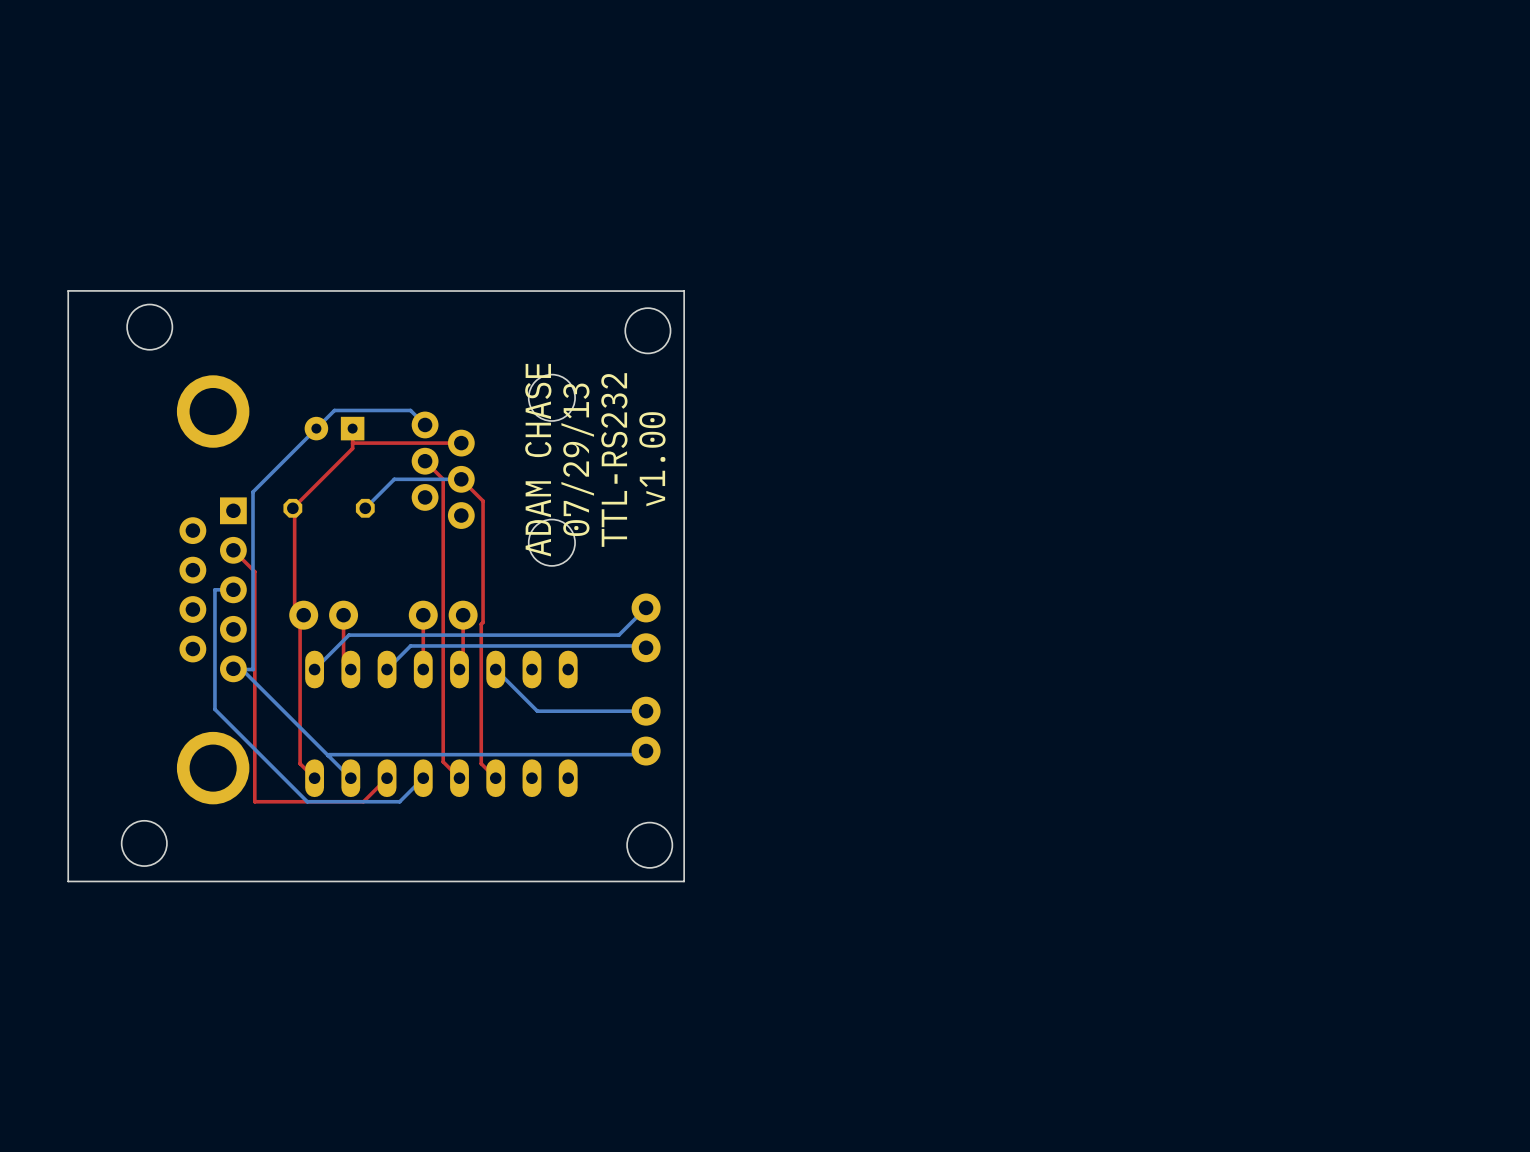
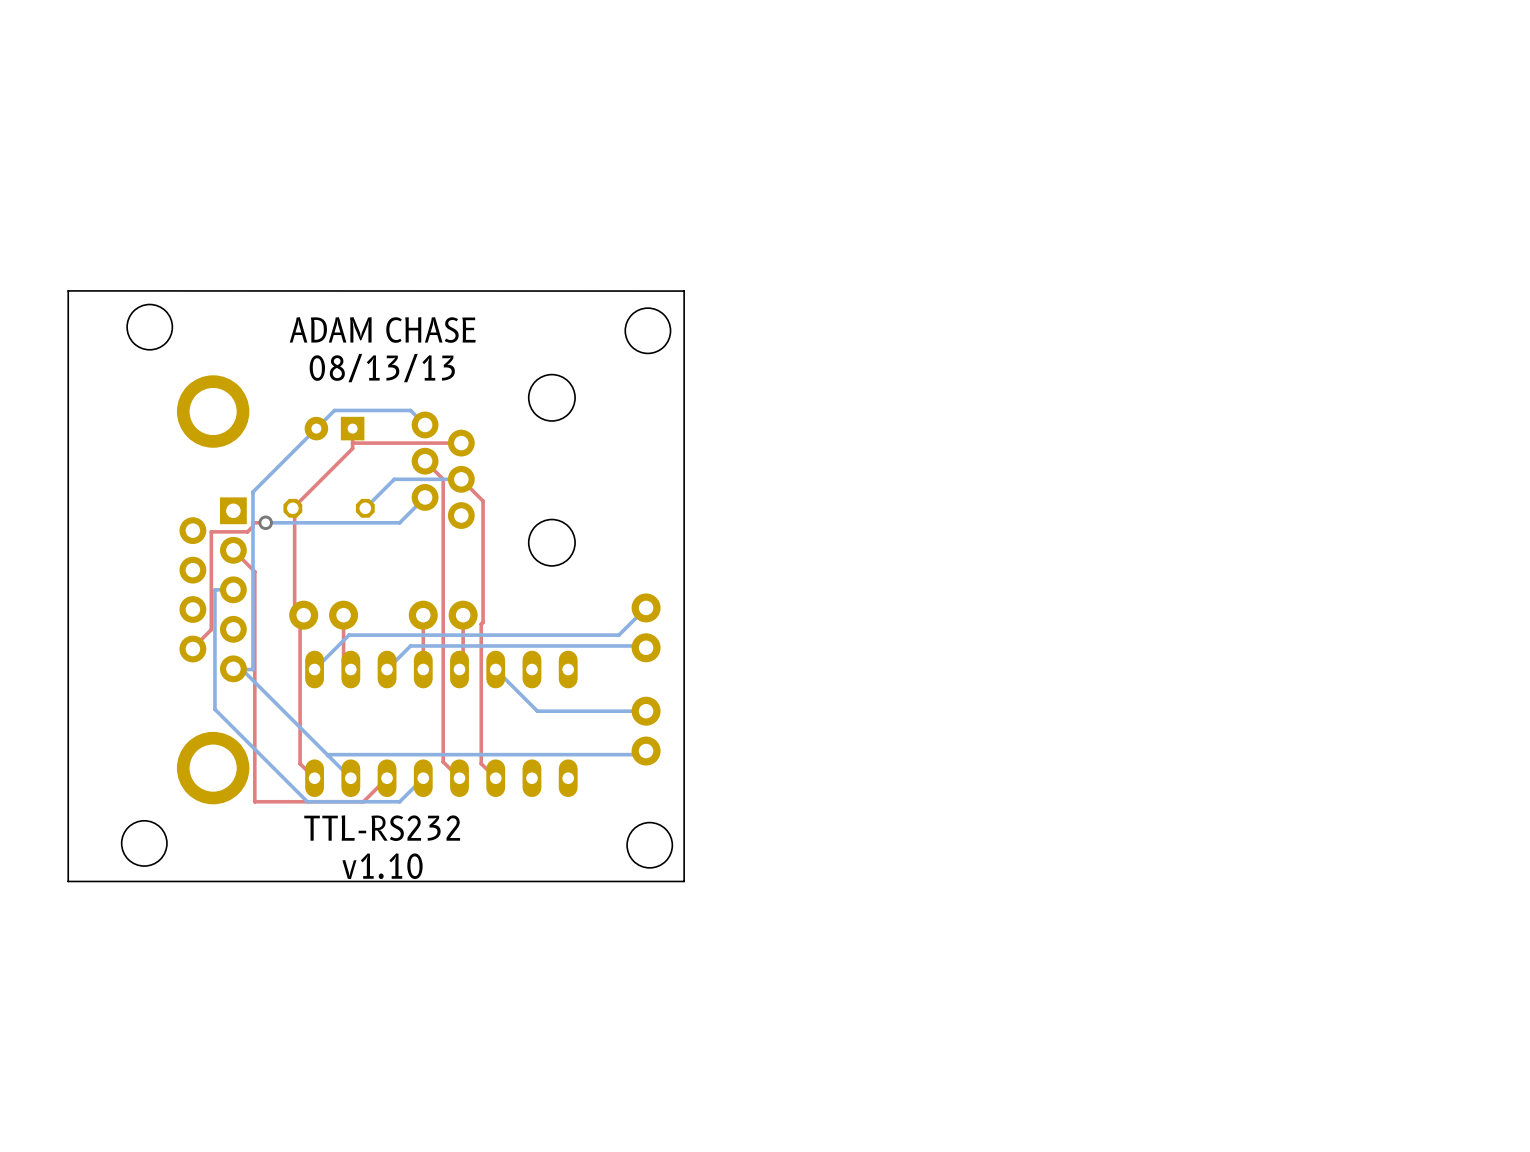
text: none -> 08/13/13 (382, 368)
text: 07/29/13 (577, 459) -> none
text: v1.00 (652, 459) -> none
text rotation: 0° (538, 460) -> 90° clockwise (382, 330)
text: TTL-RS232 (614, 460) -> none
bottom track: none -> (425, 497) (399, 522) (265, 522)
top track: none -> (265, 522) (252, 522) (252, 526) (247, 531) (211, 531) (211, 629) (192, 649)
via: none -> (265, 522)
text: none -> TTL-RS232 (382, 828)
text: none -> v1.10 (382, 866)

